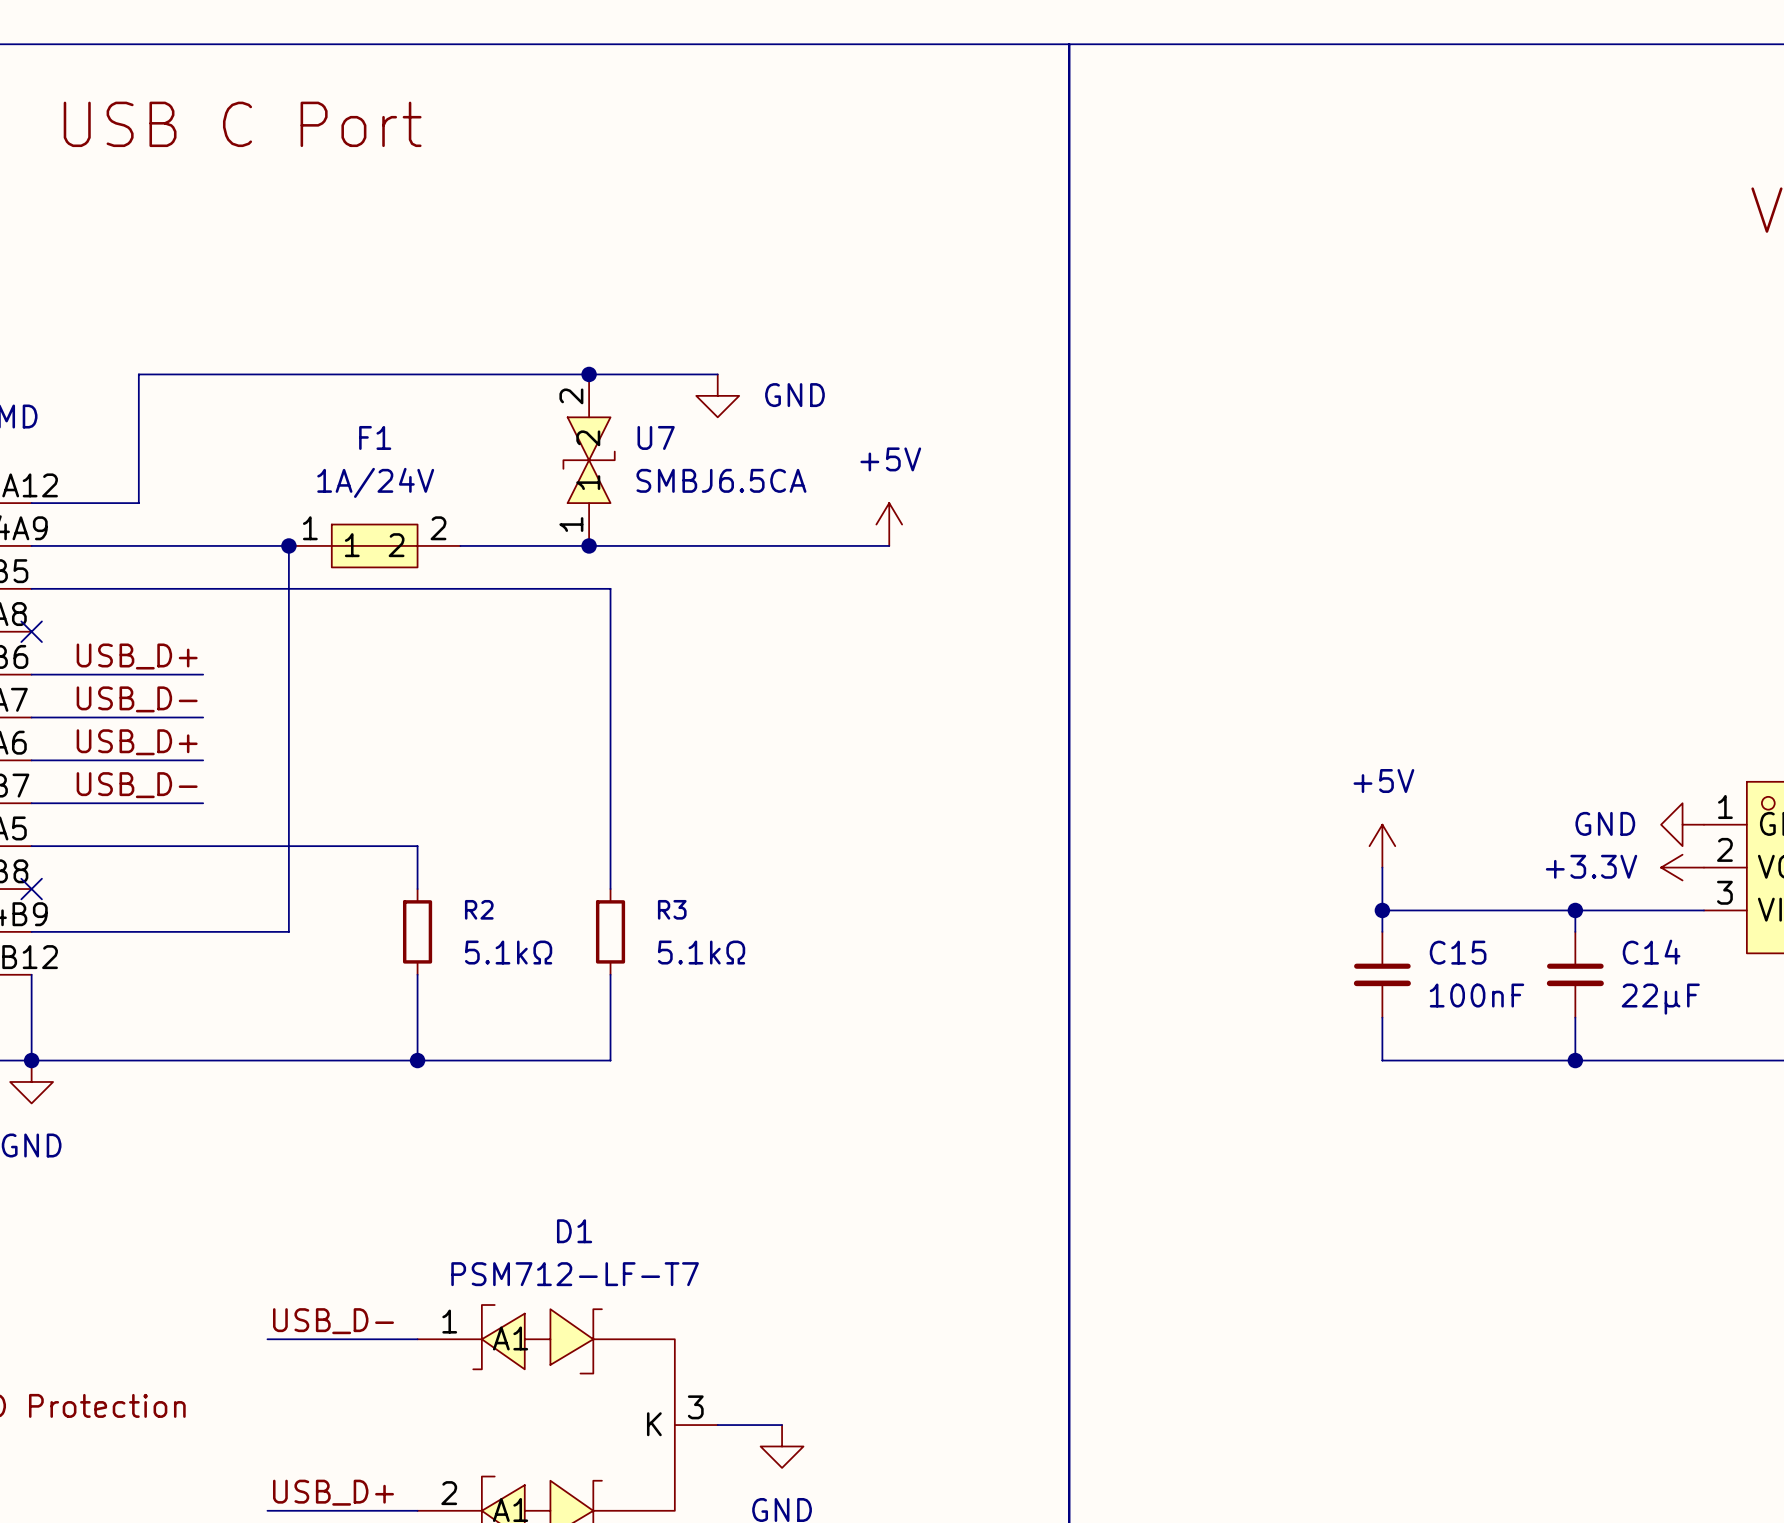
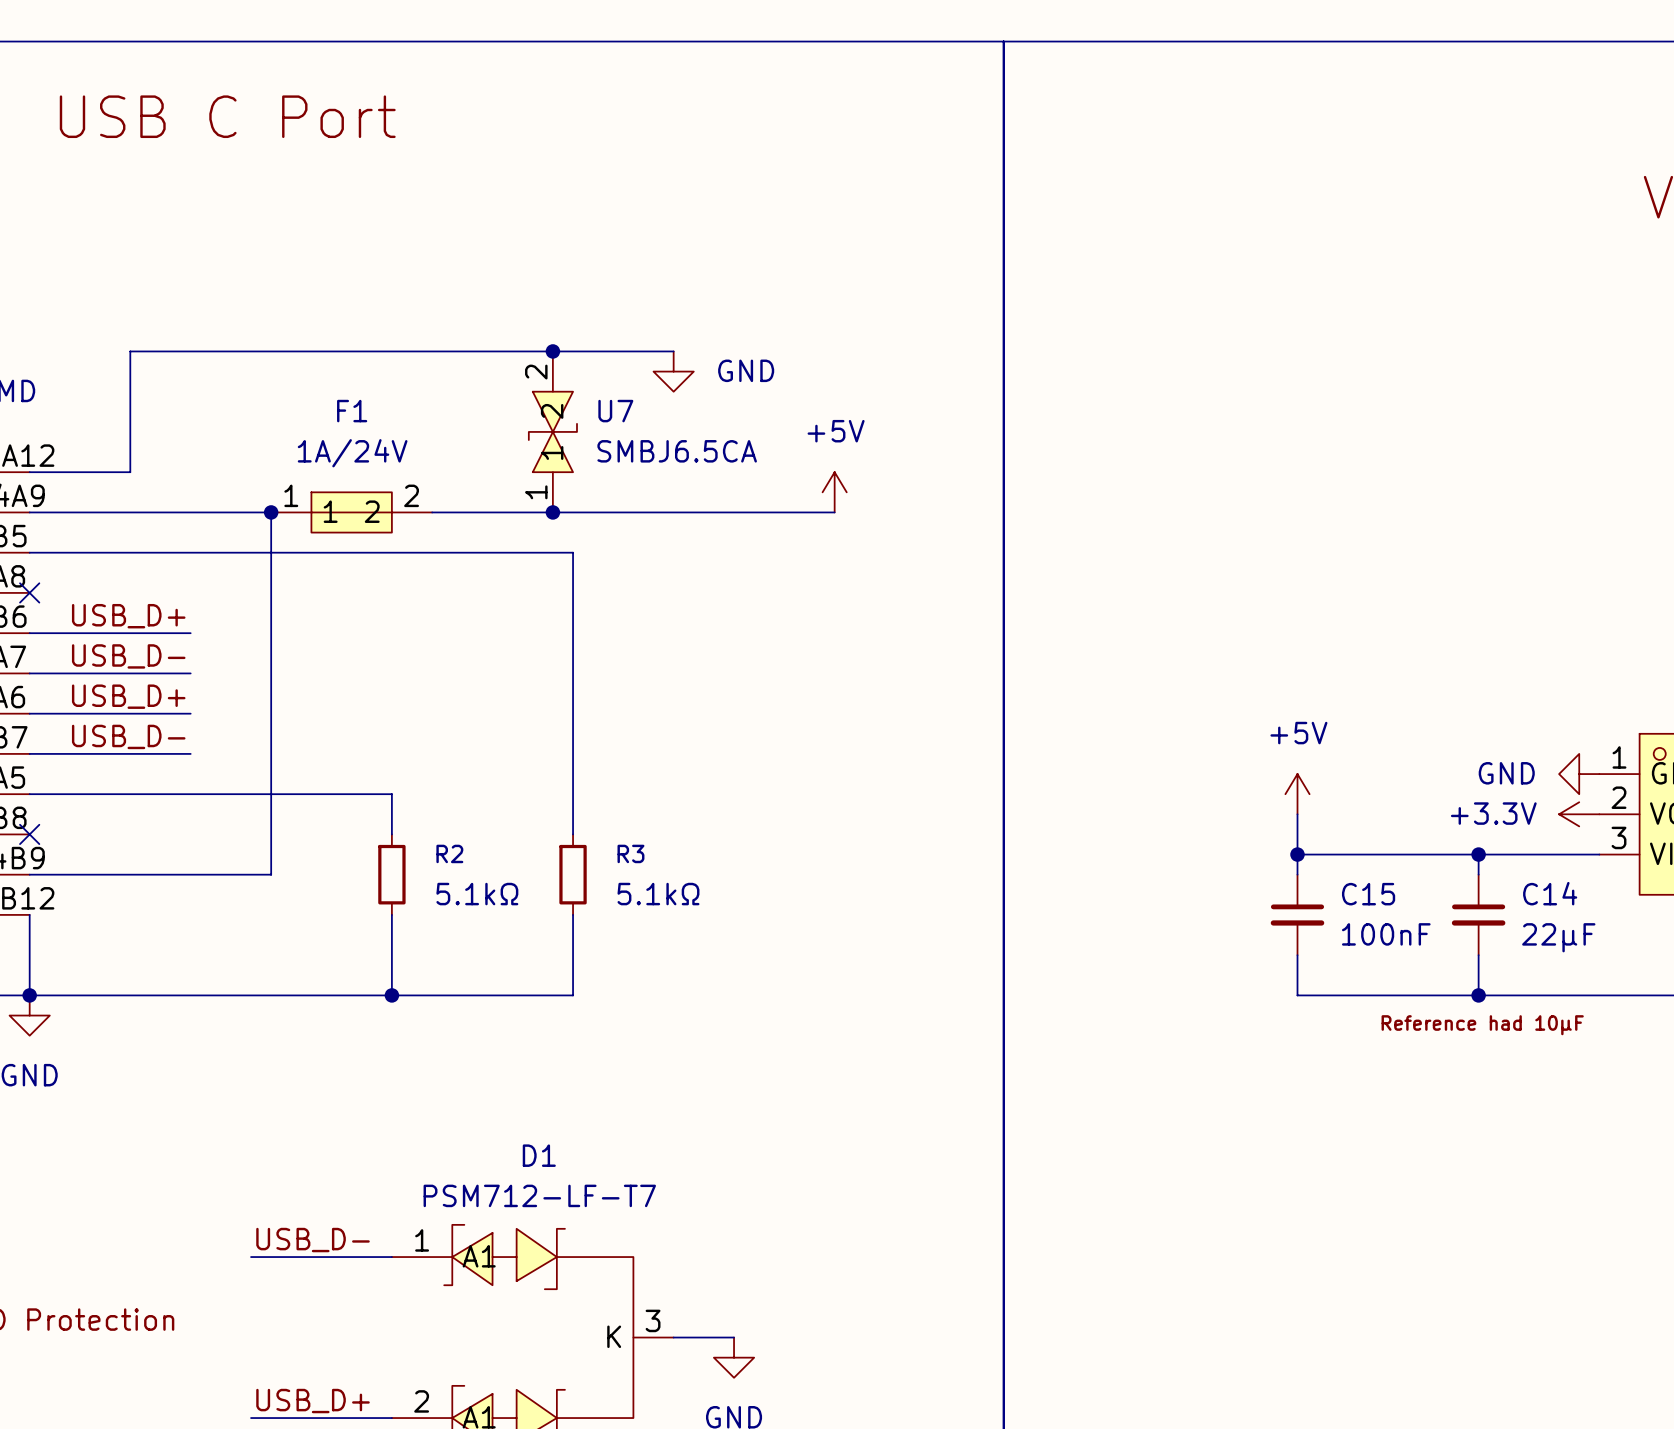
label: none -> Reference had 10µF (1482, 1025)

